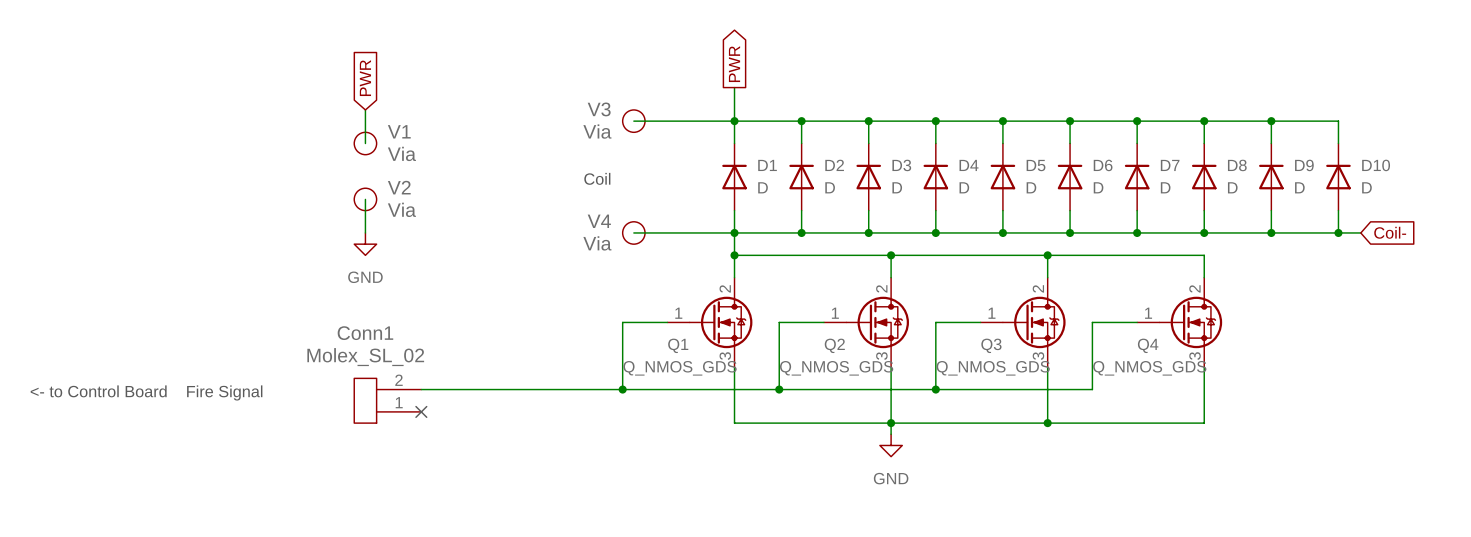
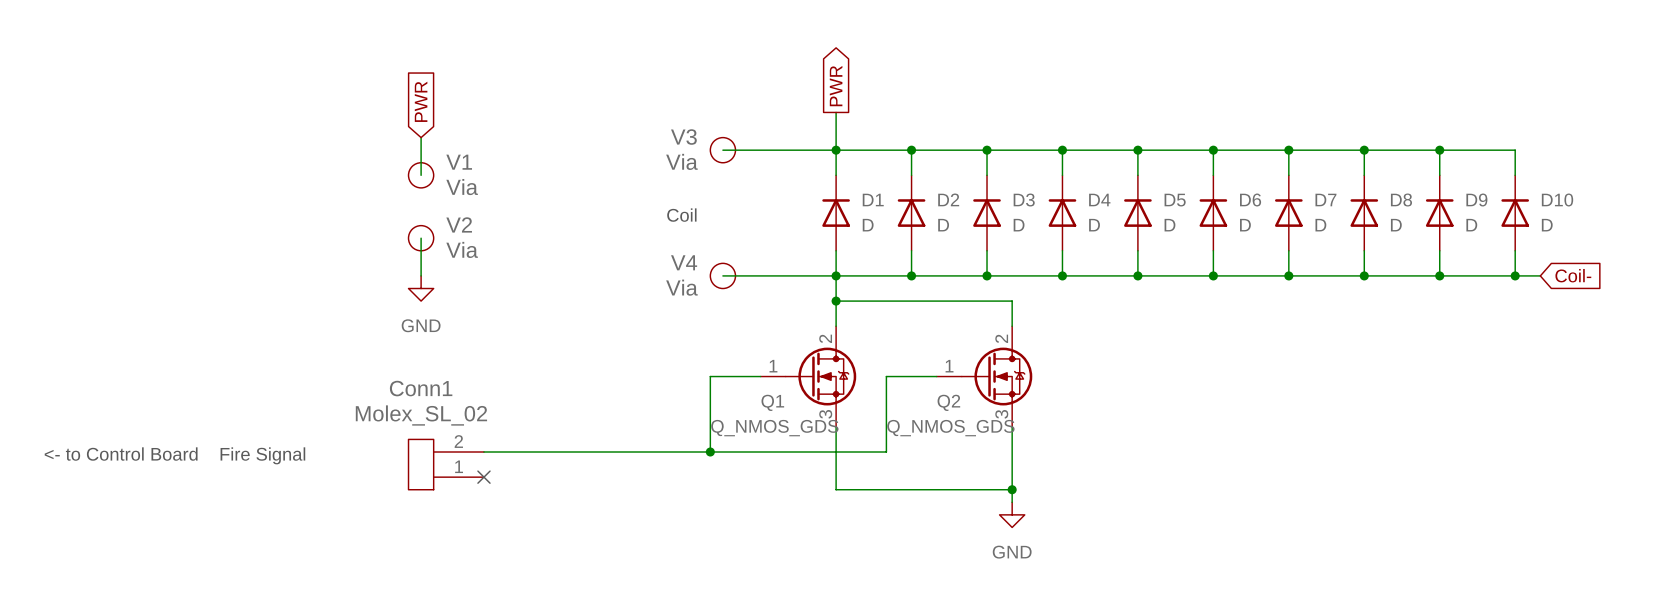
wire: (891, 255) (1204, 255) (1204, 277) -> none
junction: (891, 255) -> none
wire: (1047, 255) (1047, 277) -> none
junction: (1047, 255) -> none
wire: (980, 322) (935, 322) (935, 389) -> none
Q3: Q_NMOS_GDS (1023, 322) -> none
wire: (1137, 322) (1092, 322) (1092, 389) (779, 389) -> none
Q4: Q_NMOS_GDS (1179, 322) -> none
wire: (1047, 367) (1047, 423) -> none
wire: (1204, 367) (1204, 423) (891, 423) -> none
junction: (779, 389) -> none
junction: (935, 389) -> none
junction: (1047, 423) -> none

